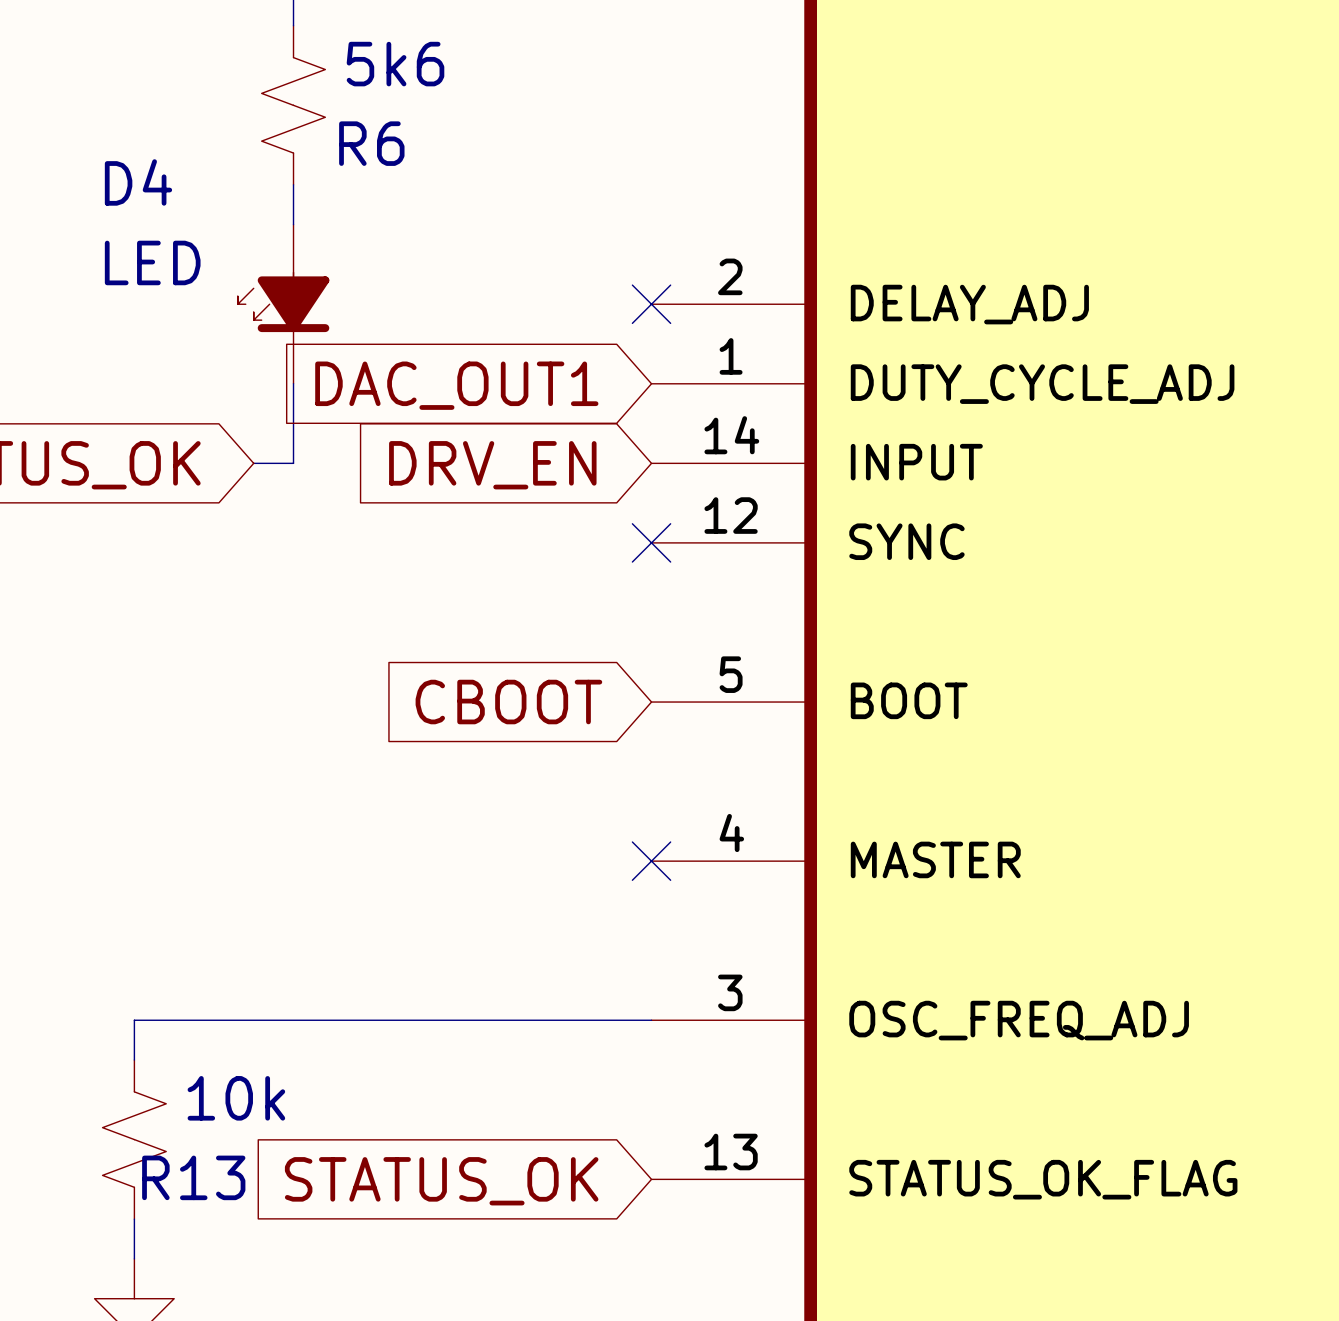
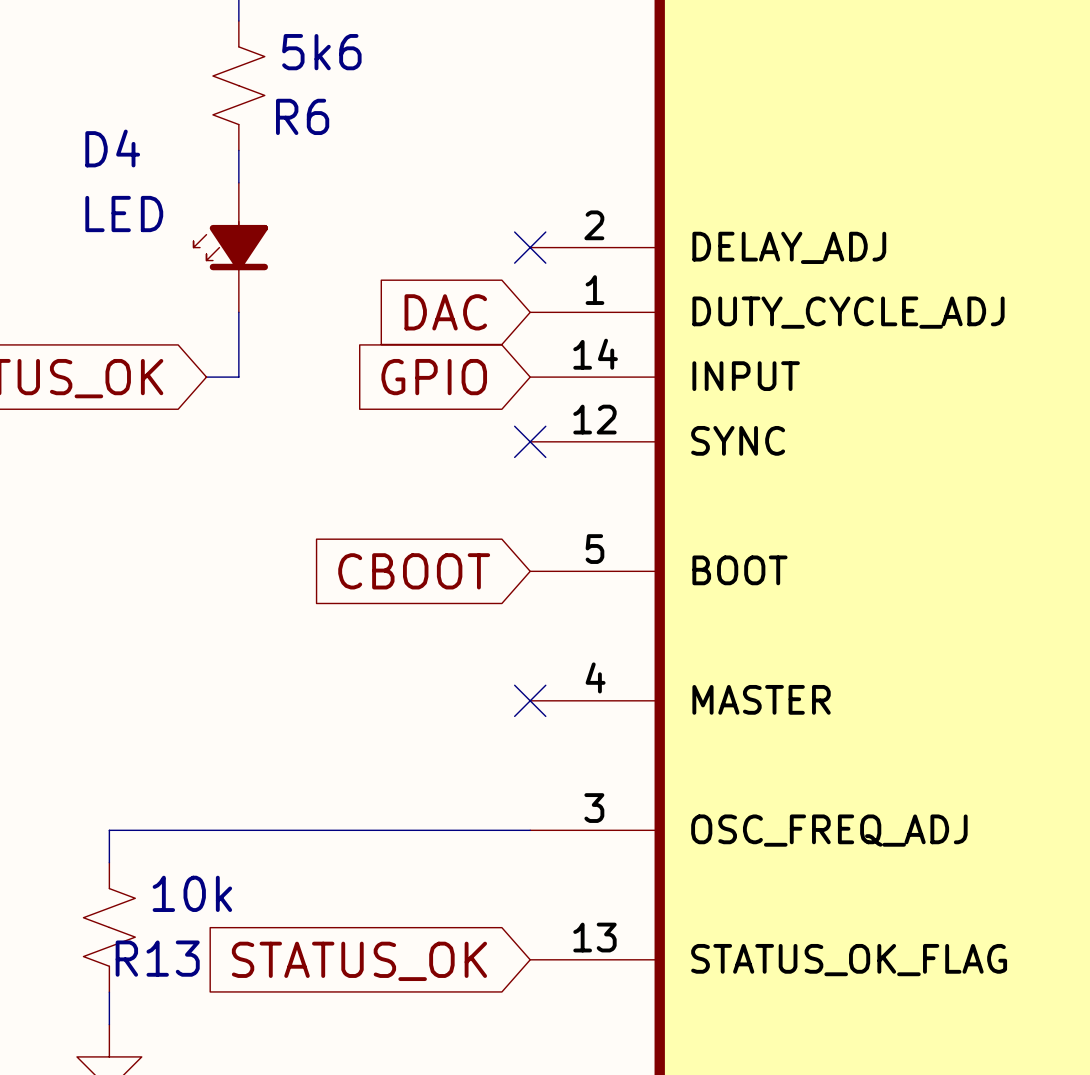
global label: DAC_OUT1 (456, 385) -> DAC (445, 312)
global label: DRV_EN (492, 465) -> GPIO (434, 377)

